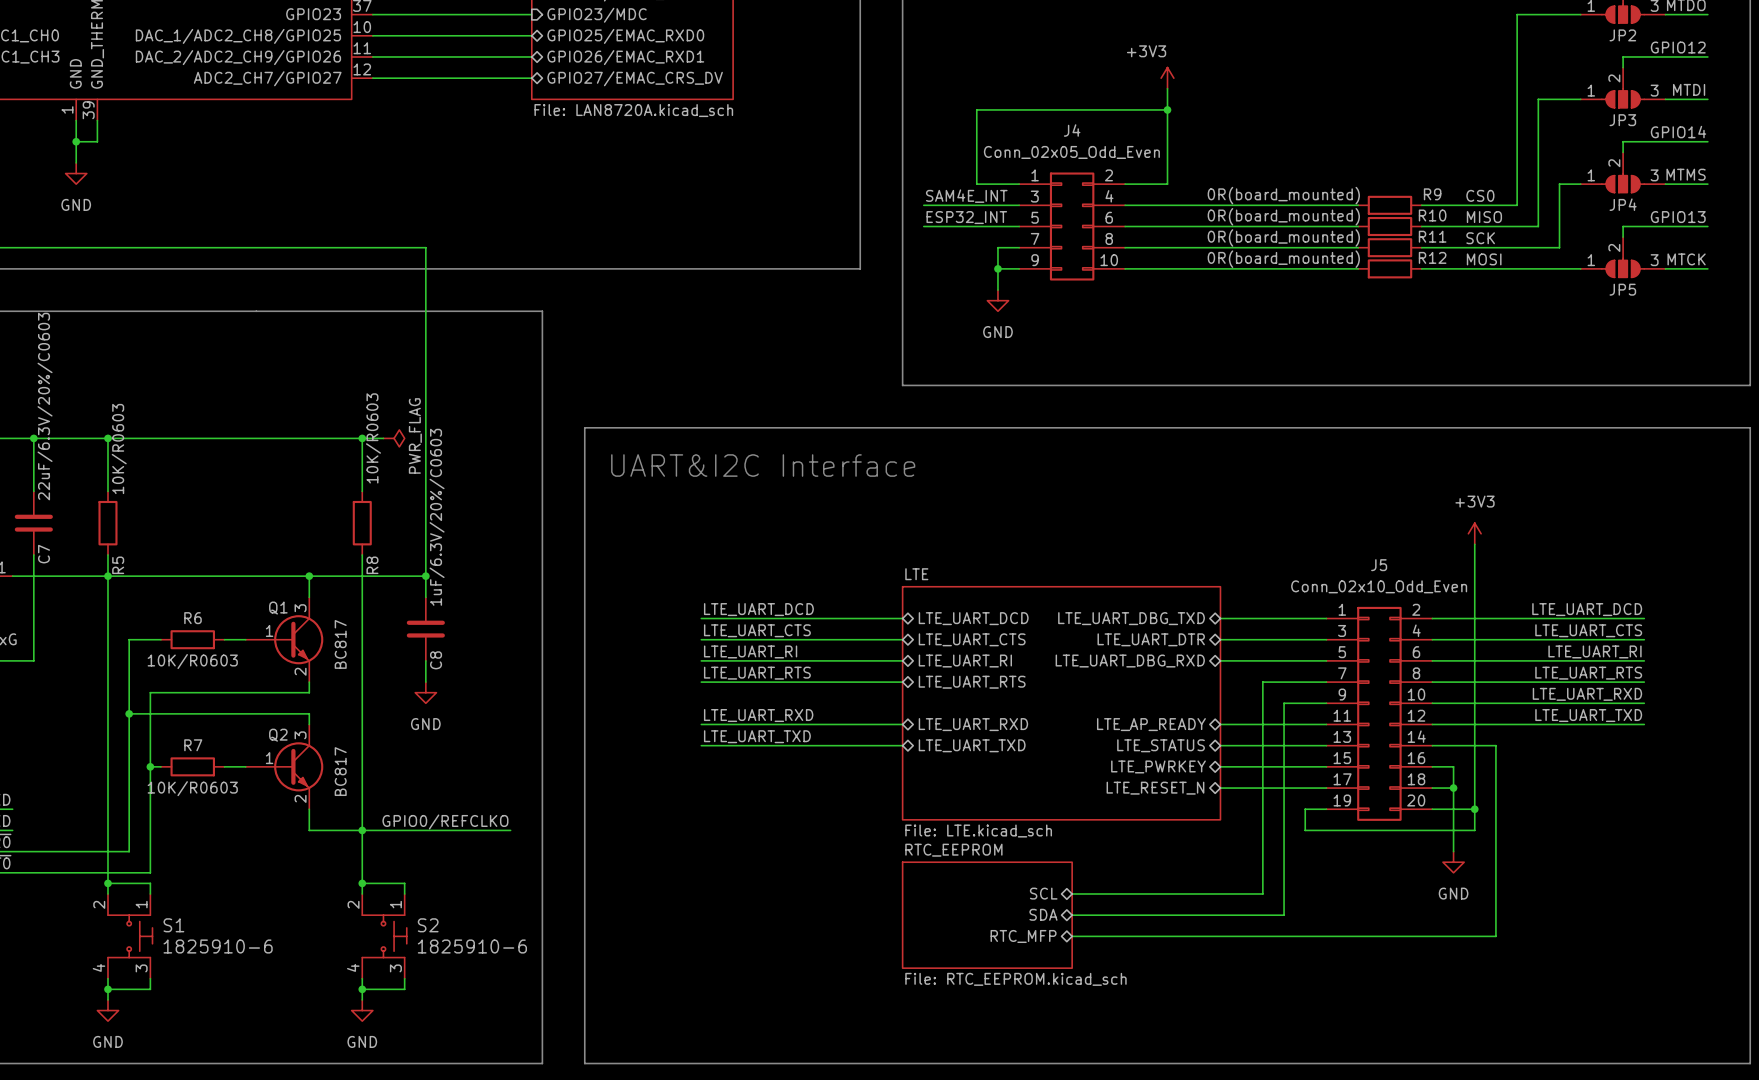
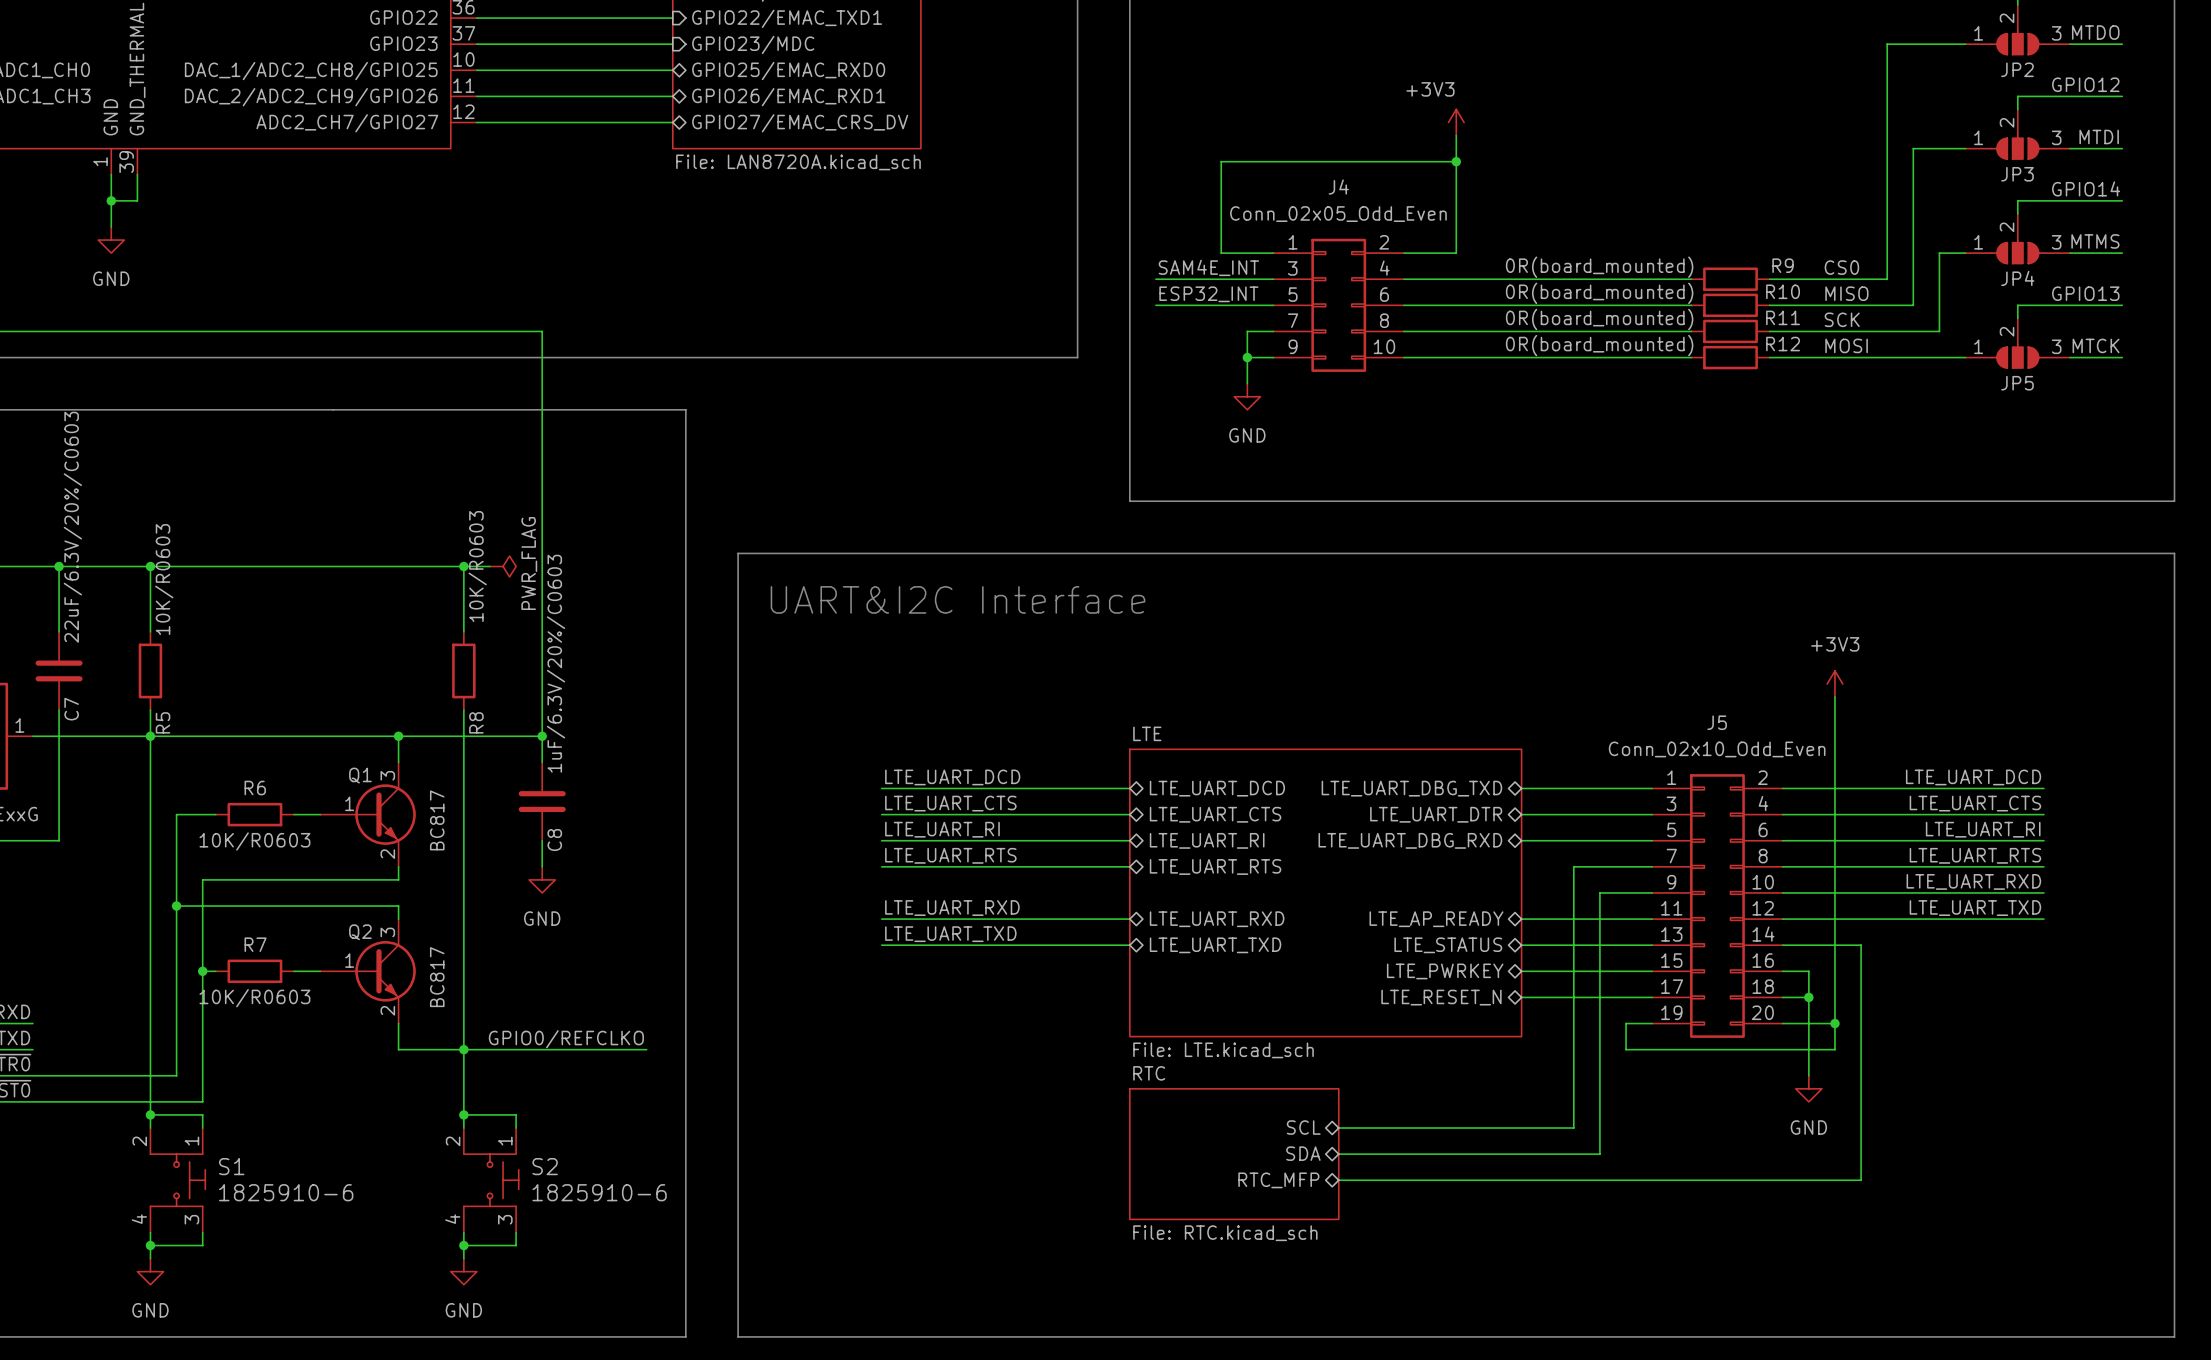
sheet RTC_EEPROM name: RTC_EEPROM (953, 850) -> RTC (1149, 1073)
sheet RTC_EEPROM value: File: RTC_EEPROM.kicad_sch (1015, 979) -> File: RTC.kicad_sch (1225, 1233)

